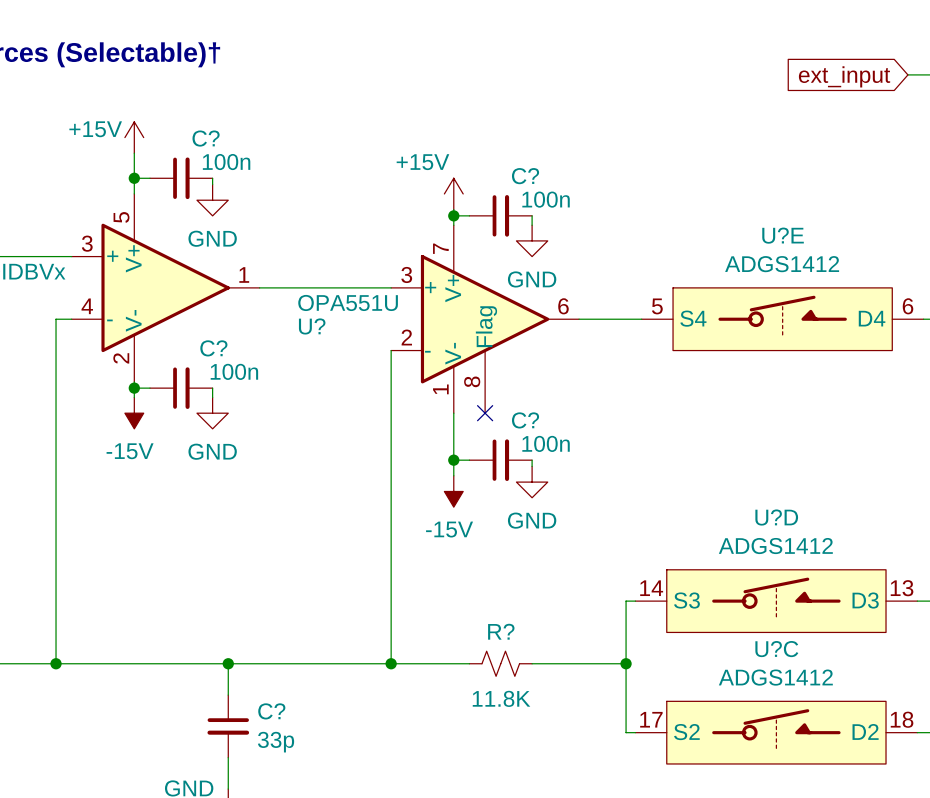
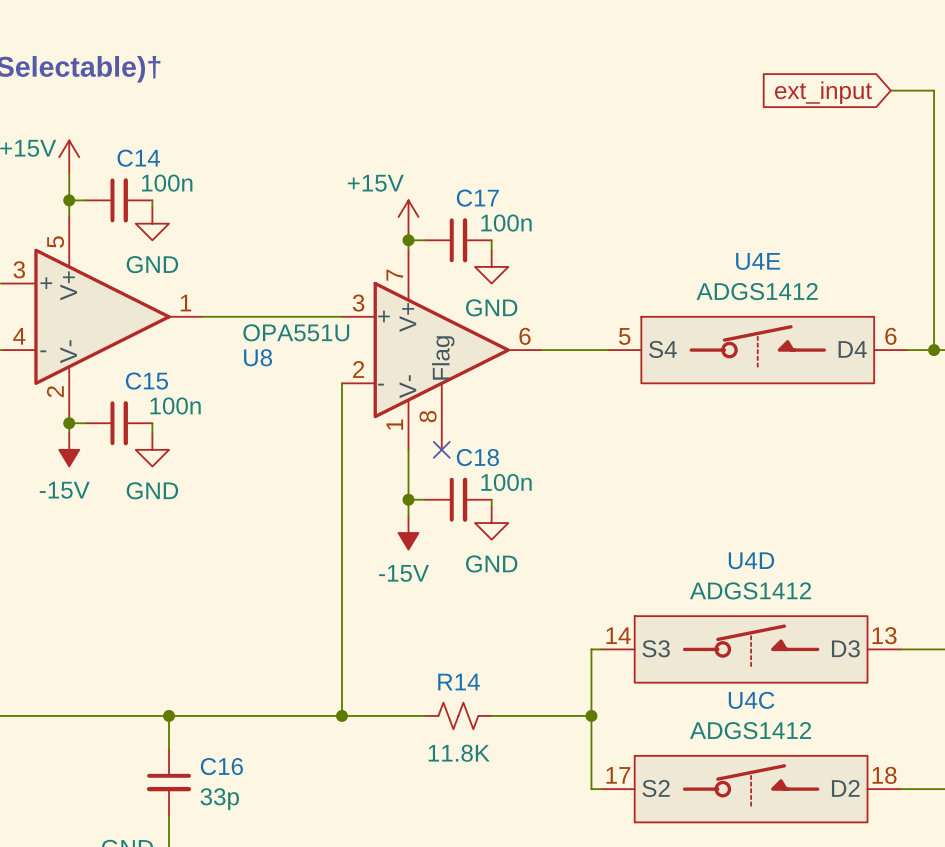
C? name: C? (206, 138) -> C14 (138, 158)
C? name: C? (525, 176) -> C17 (477, 198)
U?E name: U?E (783, 235) -> U4E (758, 261)
U? name: U? (312, 326) -> U8 (258, 357)
C? name: C? (213, 348) -> C15 (146, 381)
C? name: C? (525, 420) -> C18 (477, 457)
U?D name: U?D (776, 517) -> U4D (751, 560)
R? name: R? (501, 631) -> R14 (459, 682)
U?C name: U?C (776, 649) -> U4C (751, 700)
C? name: C? (271, 711) -> C16 (221, 766)

